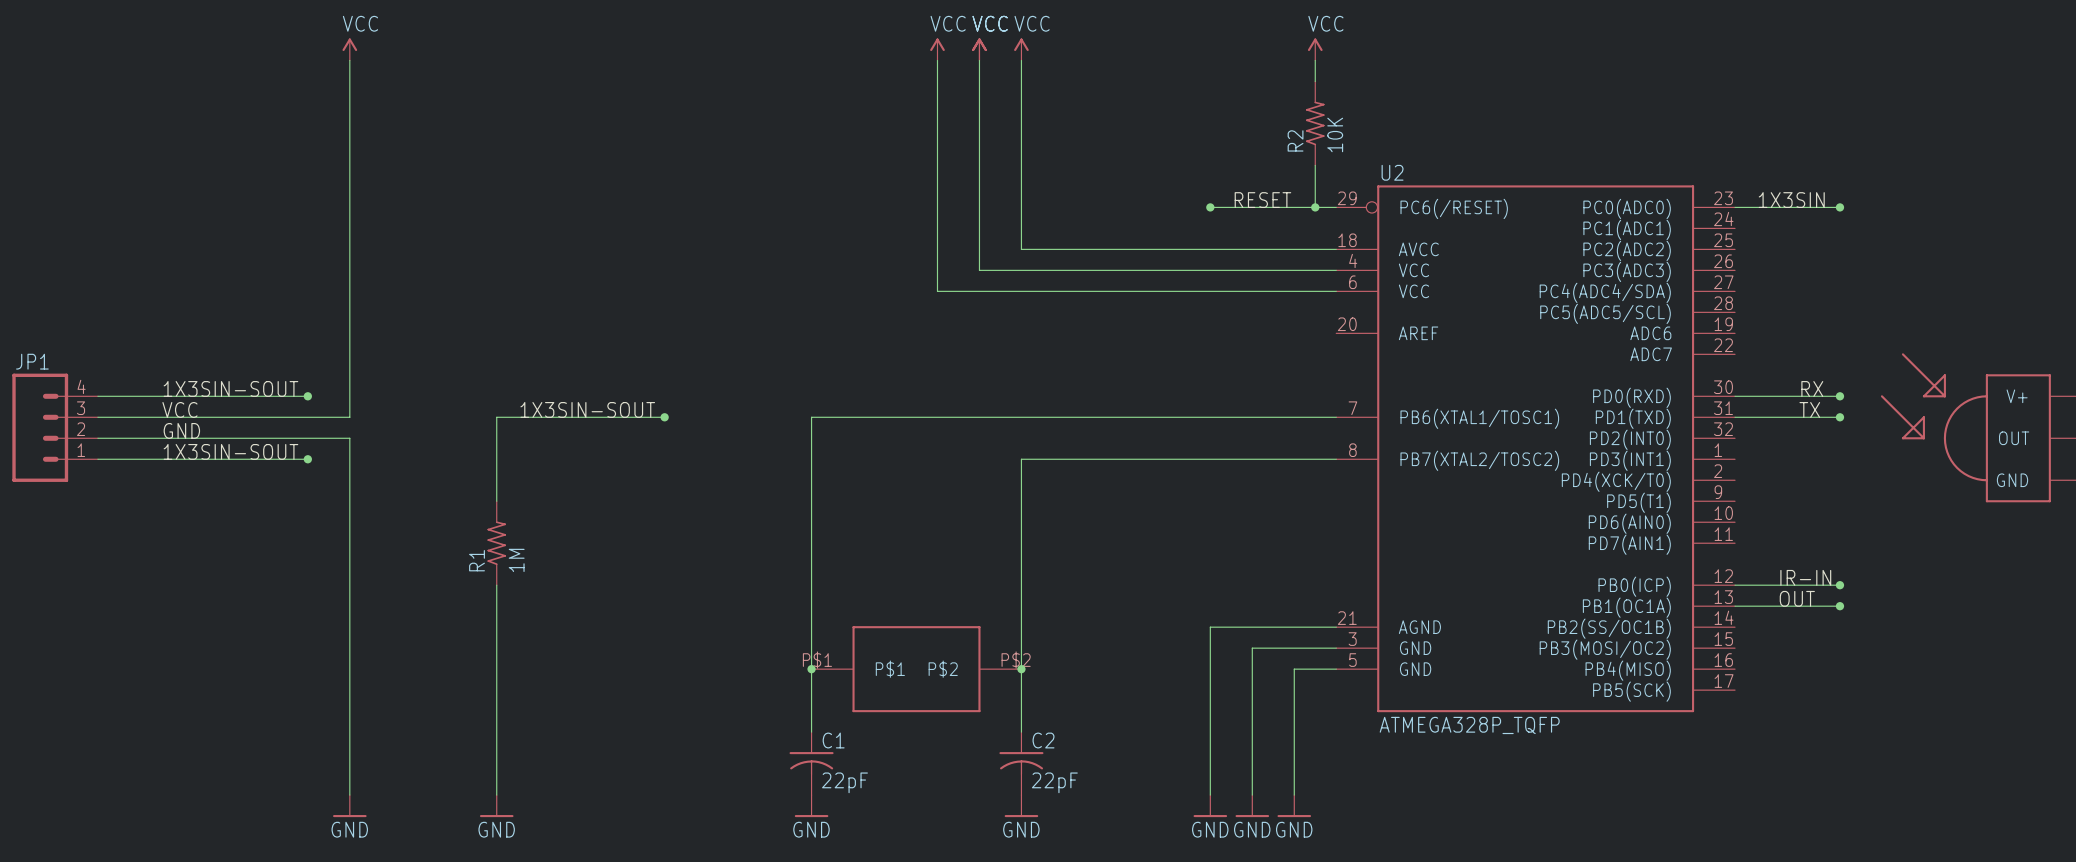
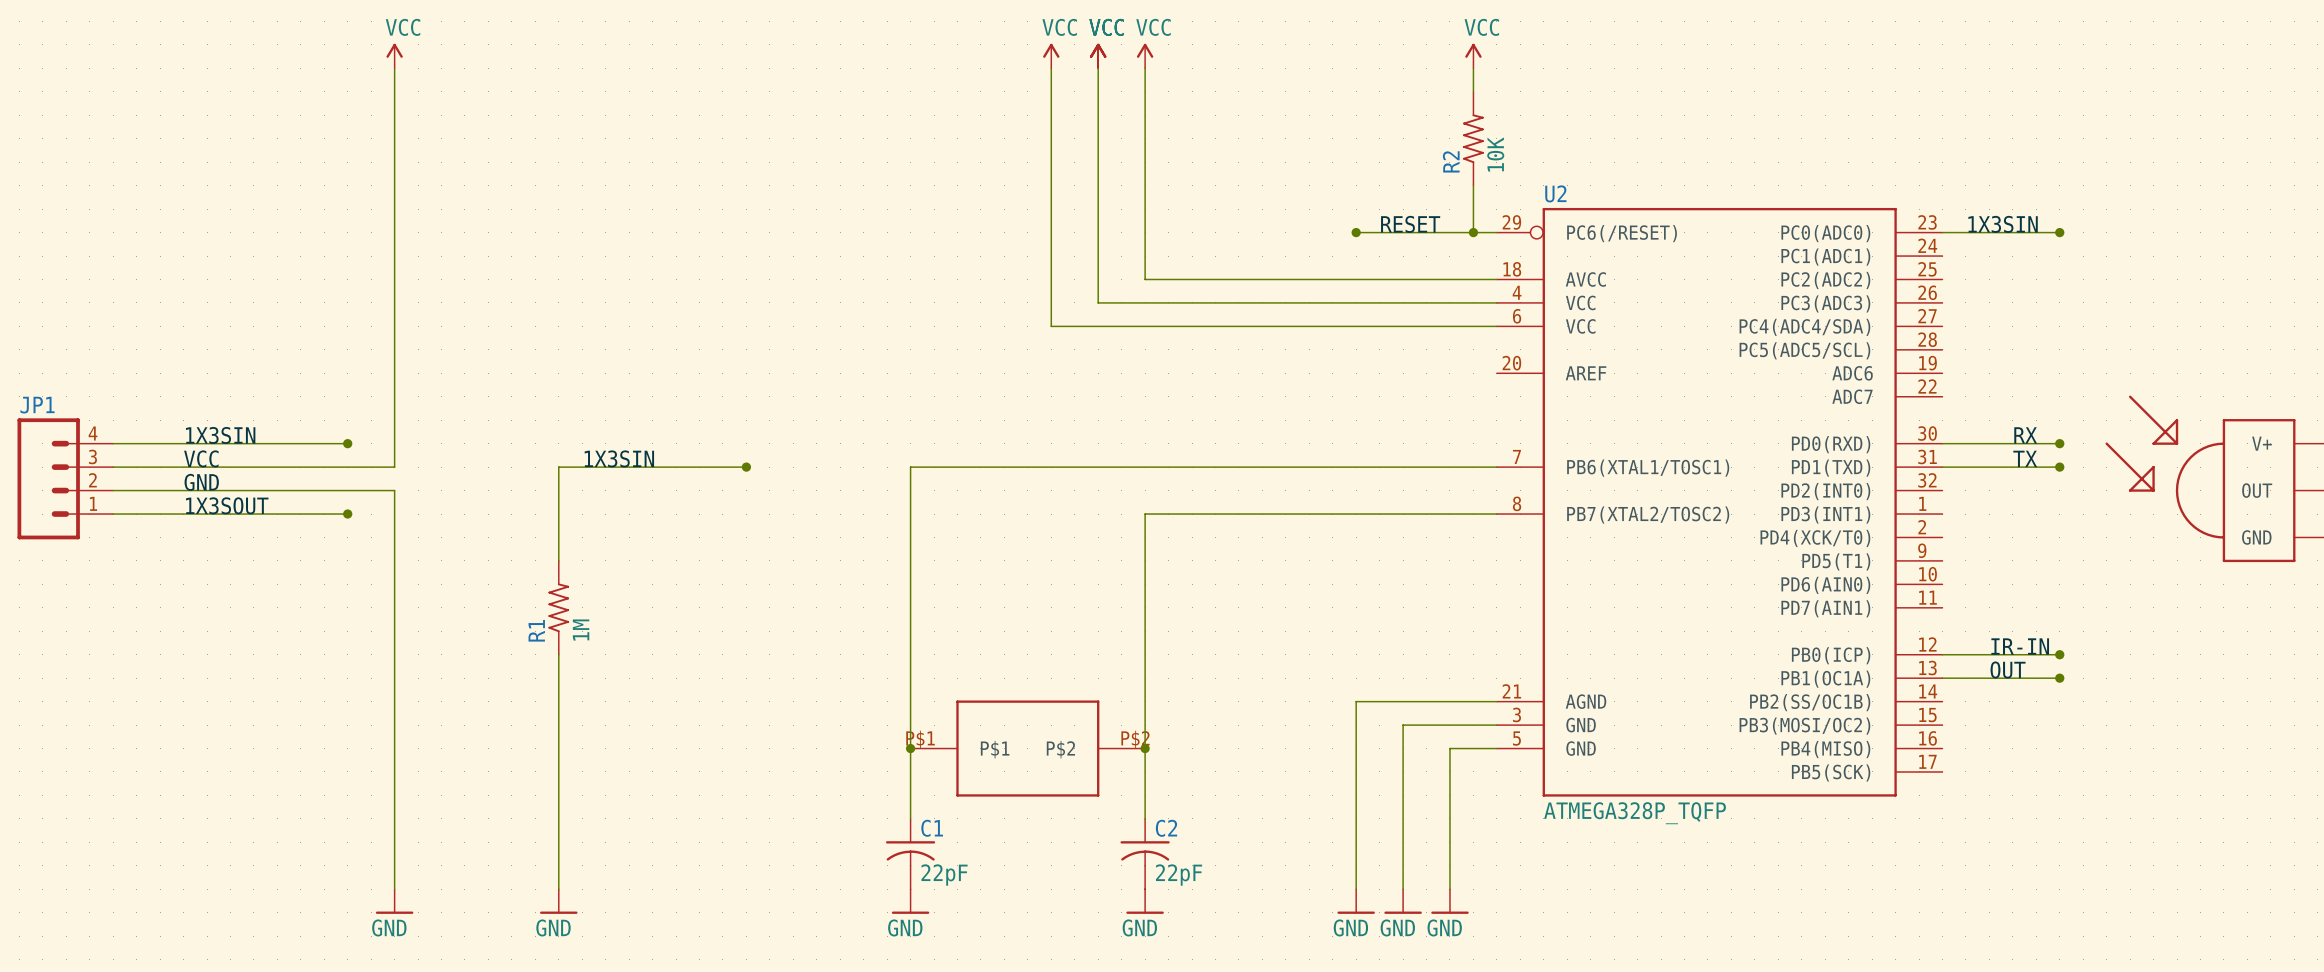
label: 1X3SIN-SOUT (230, 388) -> 1X3SIN (220, 435)
label: 1X3SIN-SOUT (587, 409) -> 1X3SIN (619, 458)
label: 1X3SIN-SOUT (230, 451) -> 1X3SOUT (227, 505)

